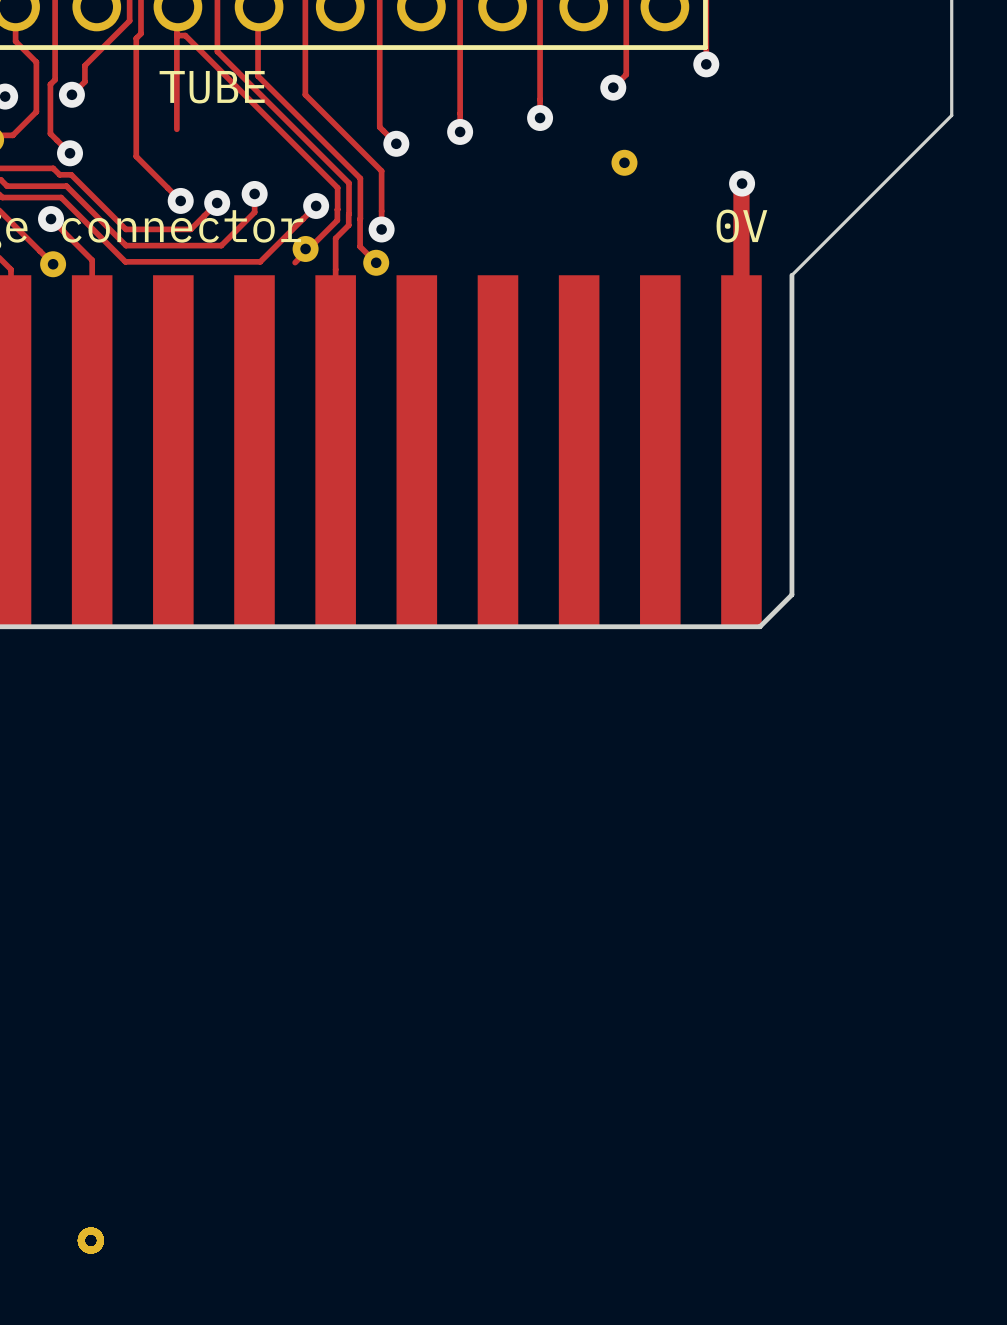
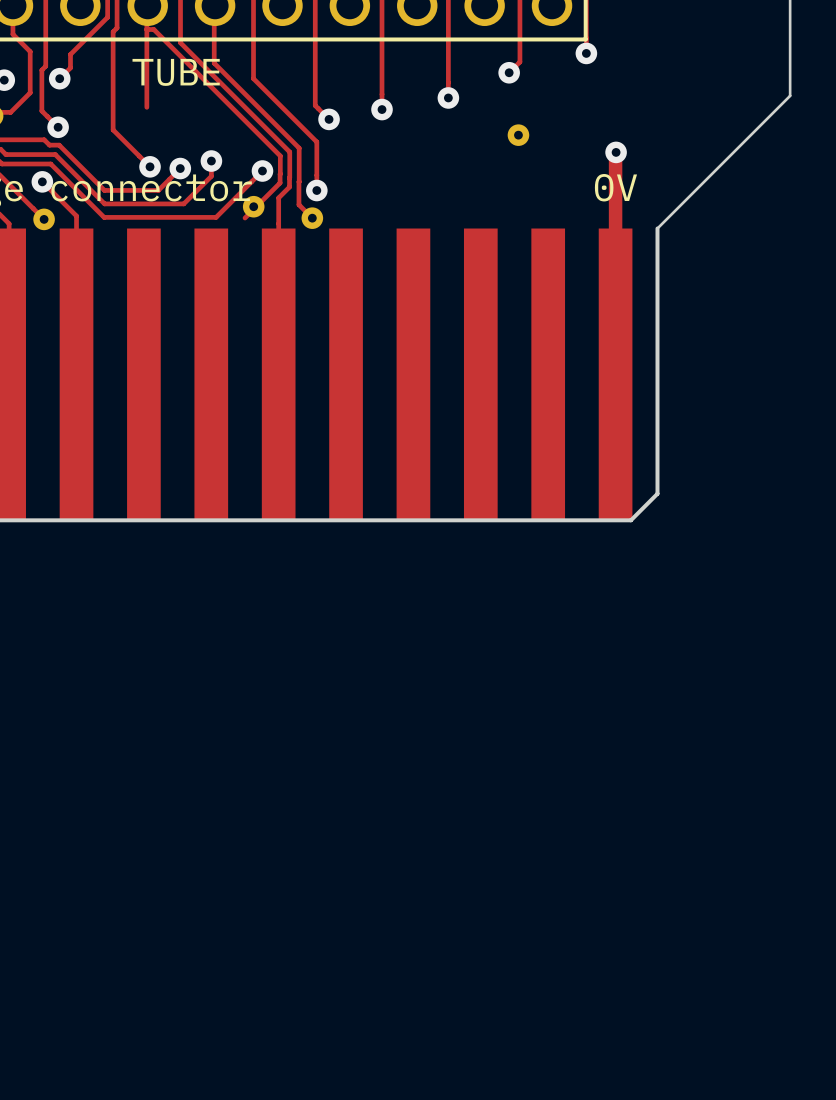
part: (90, 1240) -> none

